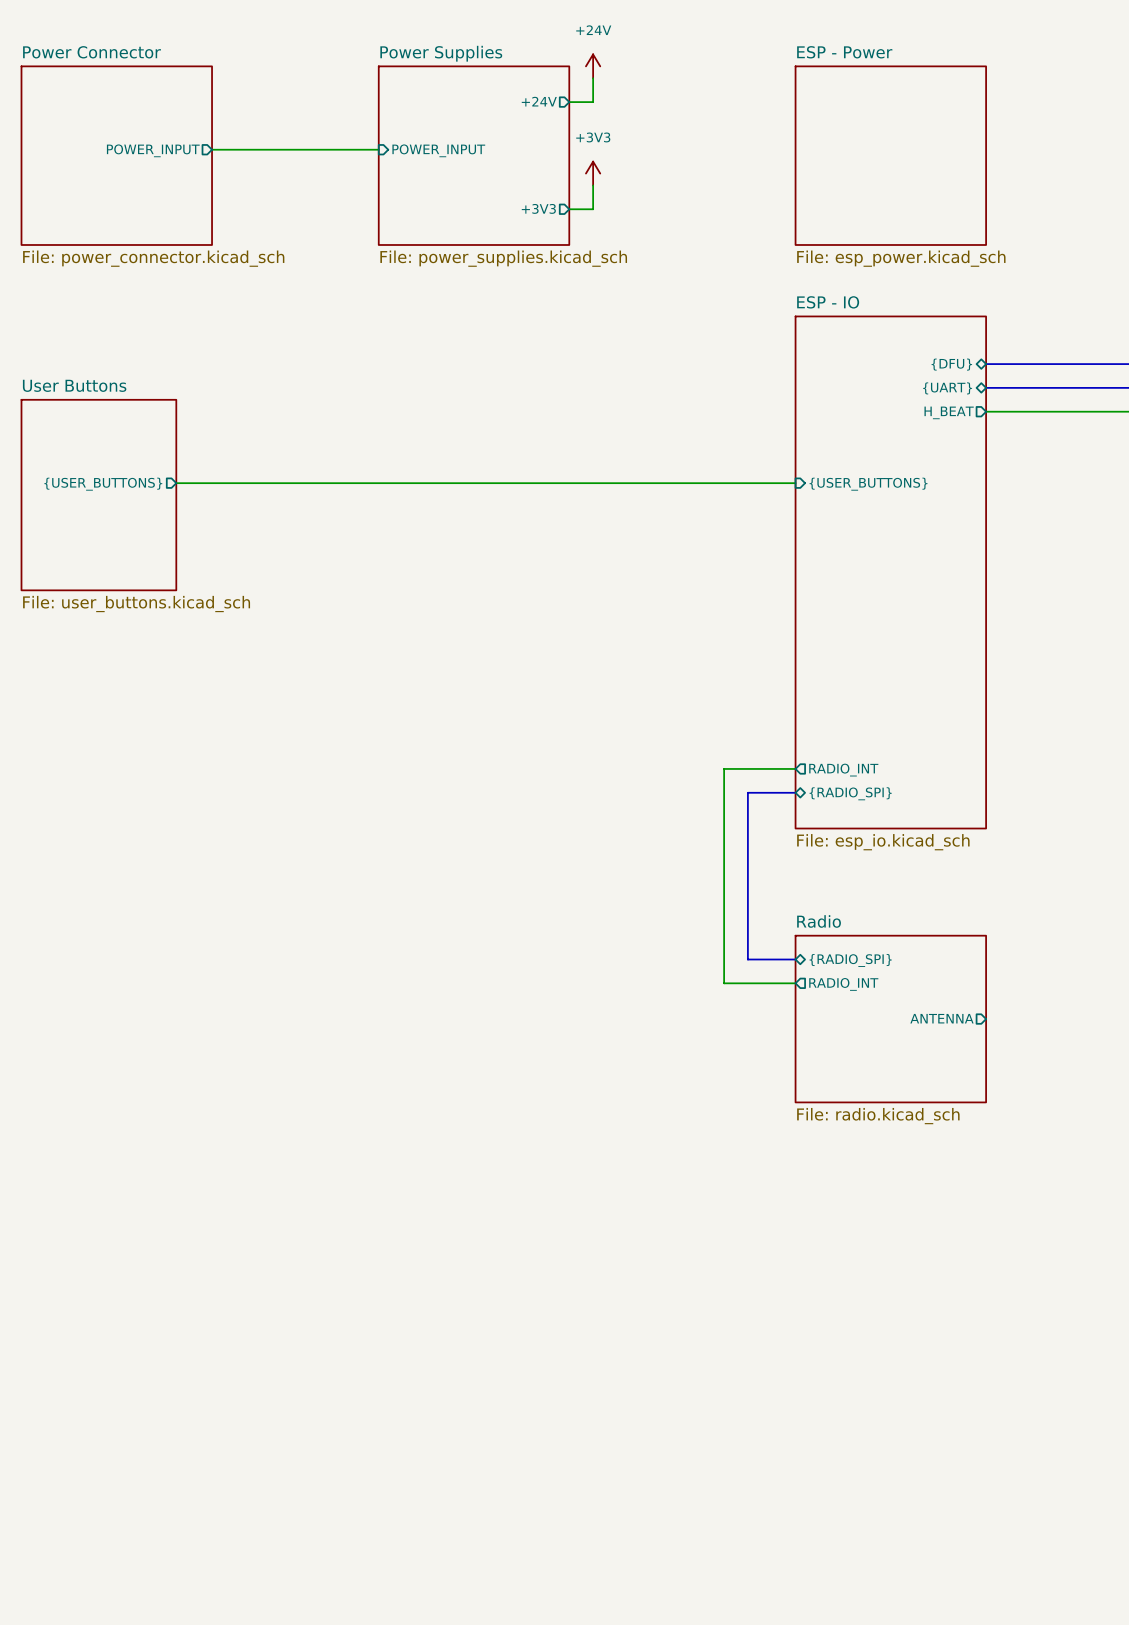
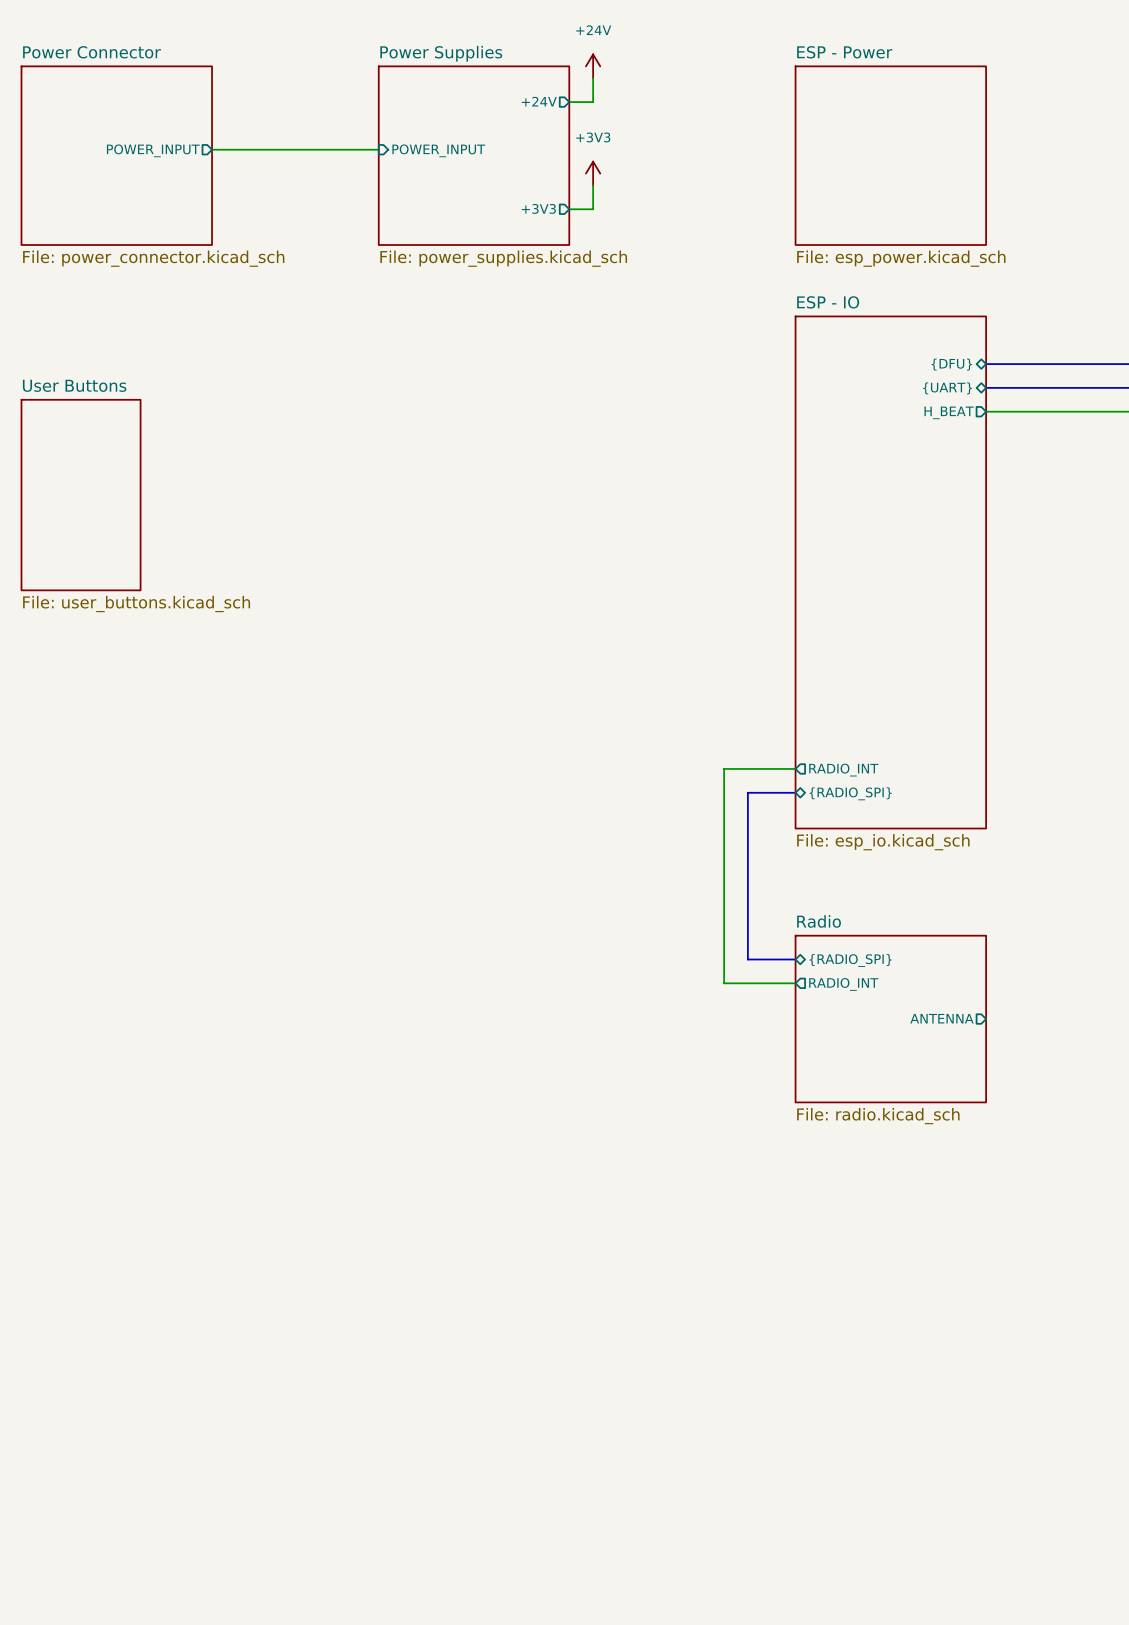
wire: (176, 483) (795, 483) -> none
sheet pin: {USER_BUTTONS} (103, 484) -> none
sheet pin: {USER_BUTTONS} (868, 484) -> none
sheet User Buttons: none -> File: user_buttons.kicad_sch (81, 495)
sheet User Buttons: File: user_buttons.kicad_sch (98, 495) -> none

